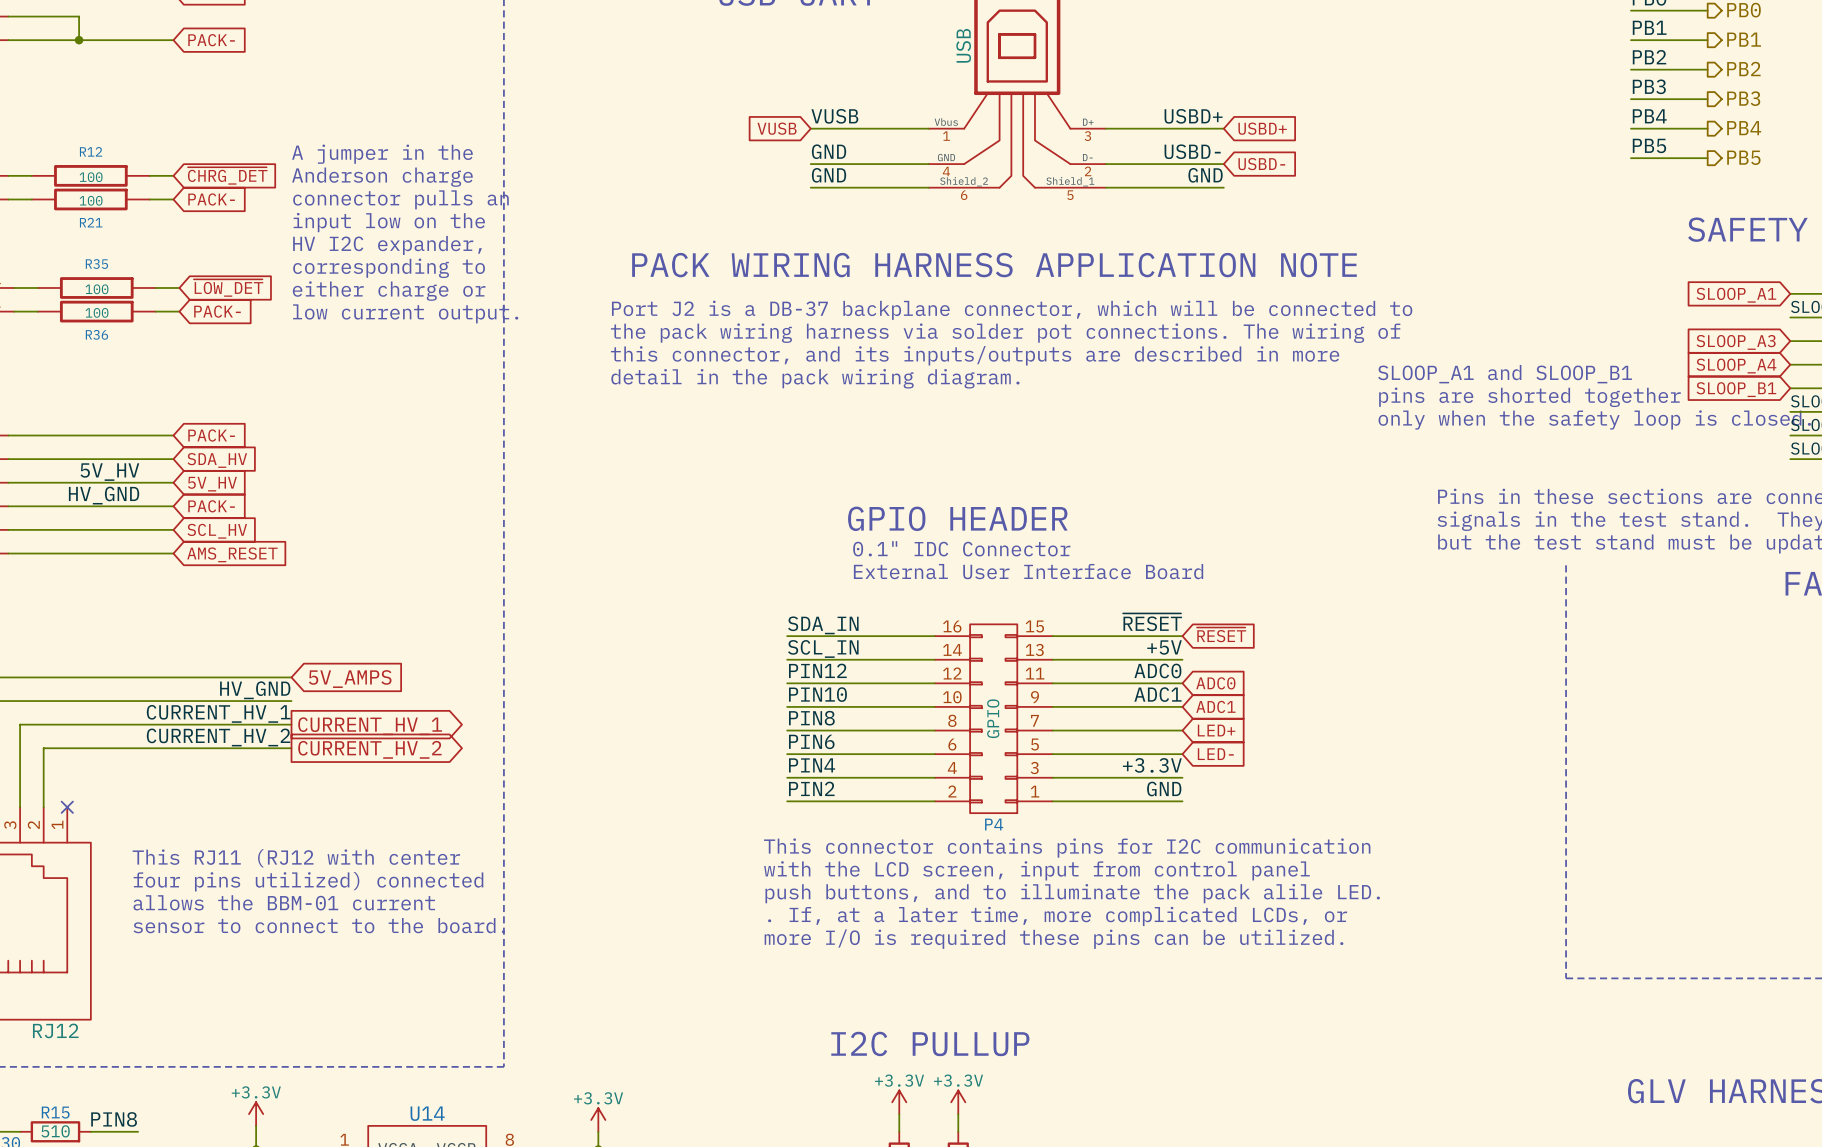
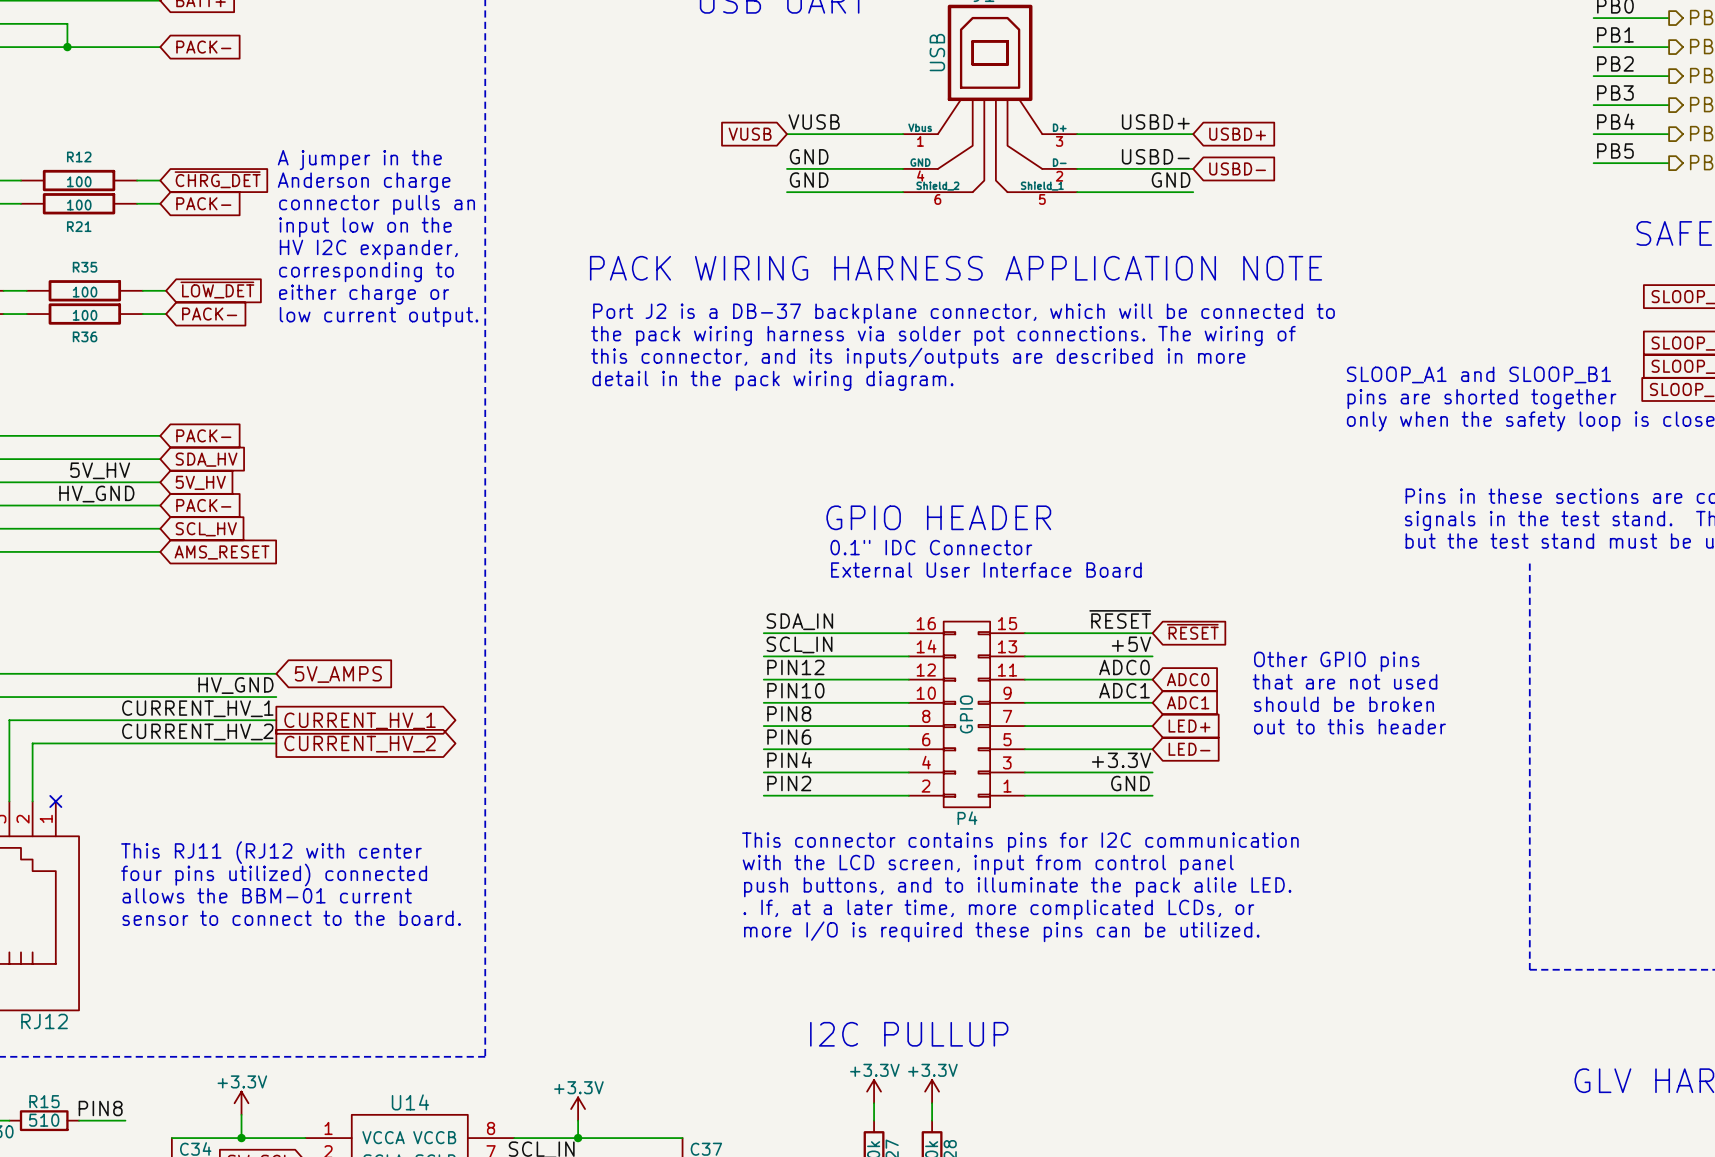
text: none -> Other GPIO pins (1336, 661)
text: none -> that are not used (1345, 681)
text: none -> should be broken (1344, 704)
text: none -> out to this header (1349, 726)

